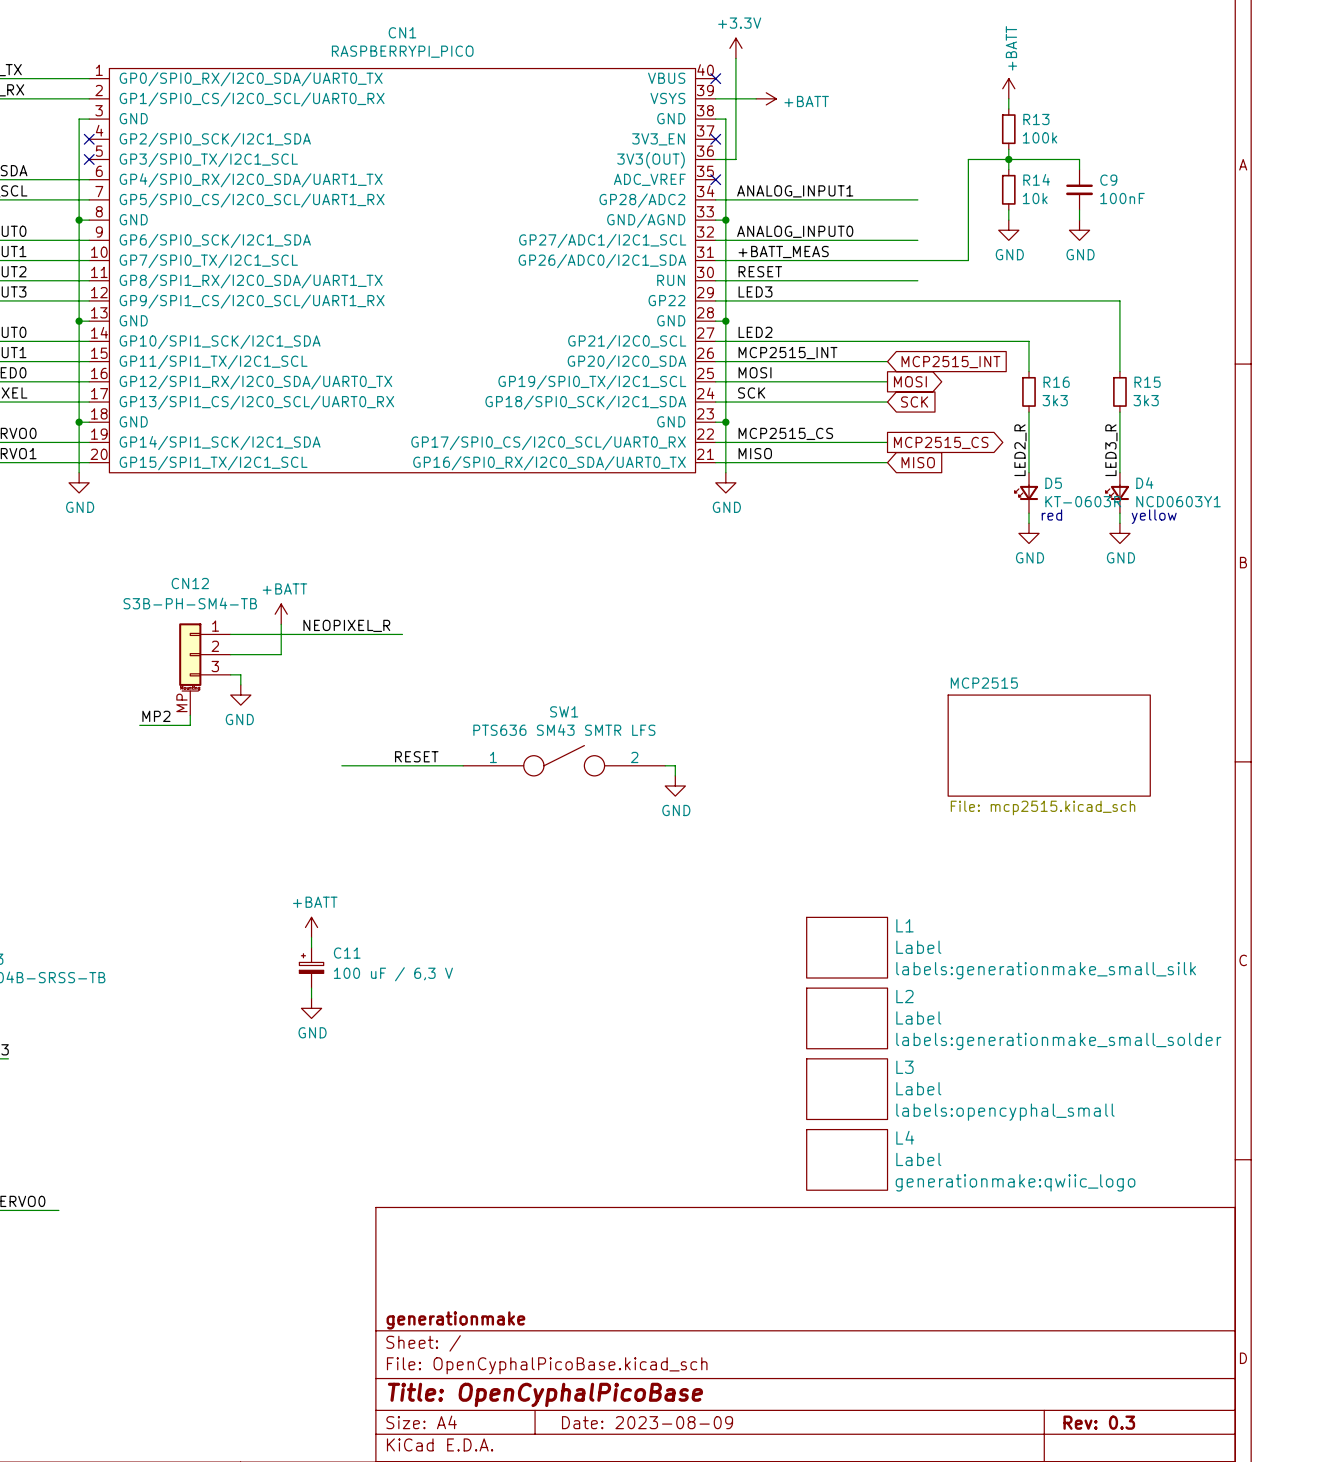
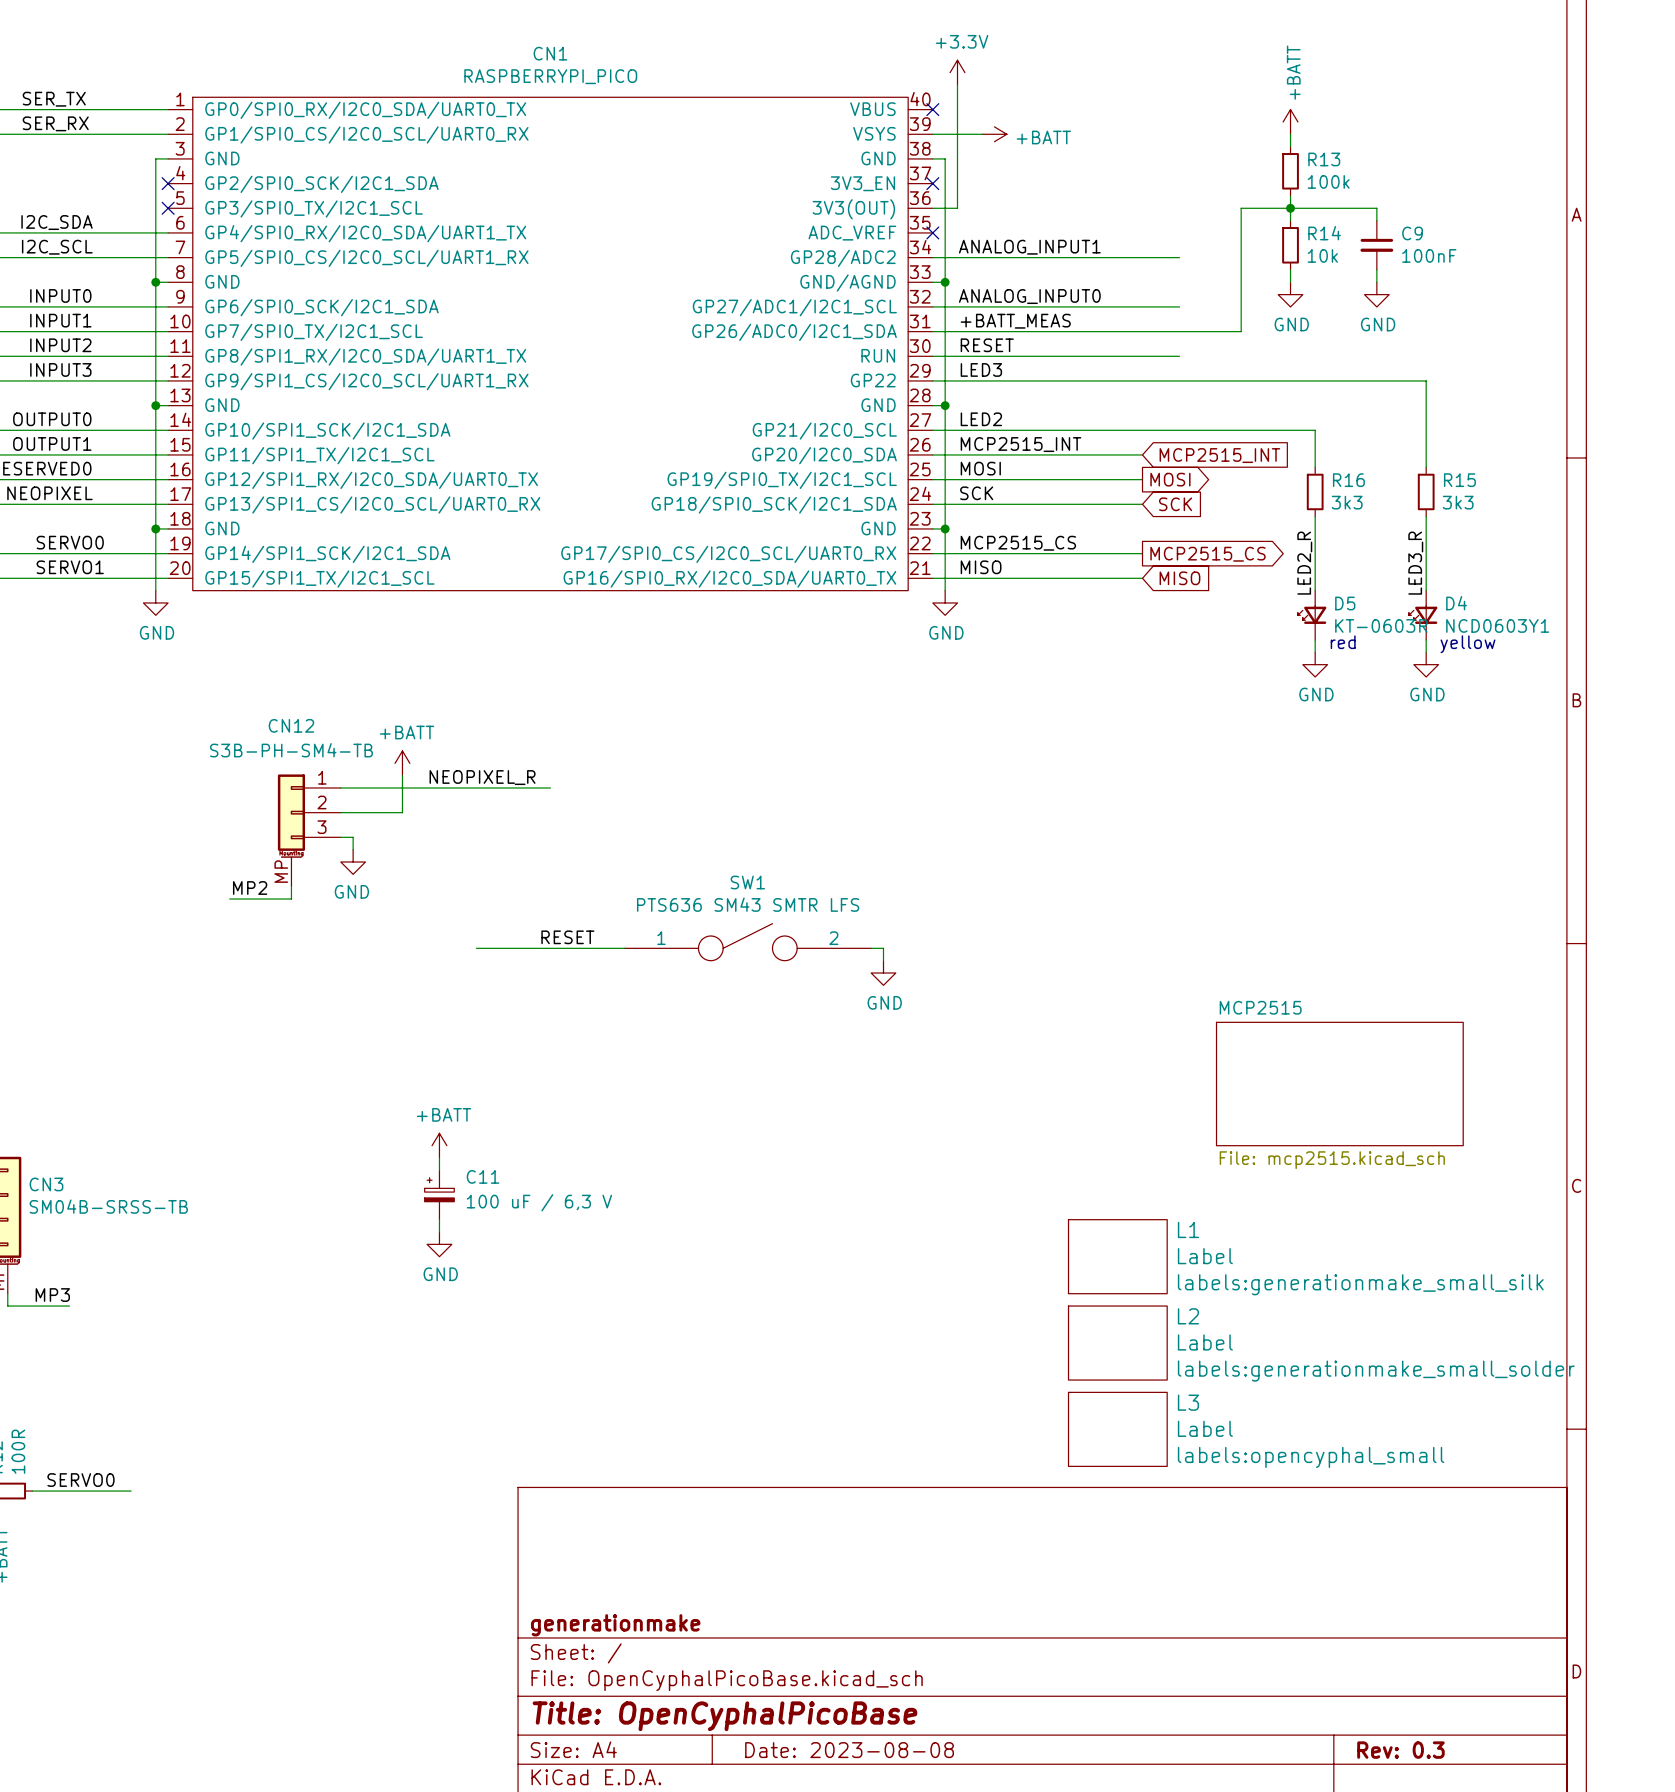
sheet MCP2515 position: (1049, 745) -> (1339, 1084)
L1 position: (847, 947) -> (1117, 1256)
L2 position: (847, 1018) -> (1117, 1343)
L3 position: (847, 1089) -> (1117, 1429)
L4: Label (847, 1159) -> none
title block: Date: 2023-08-09 (647, 1422) -> Date: 2023-08-08 (849, 1750)

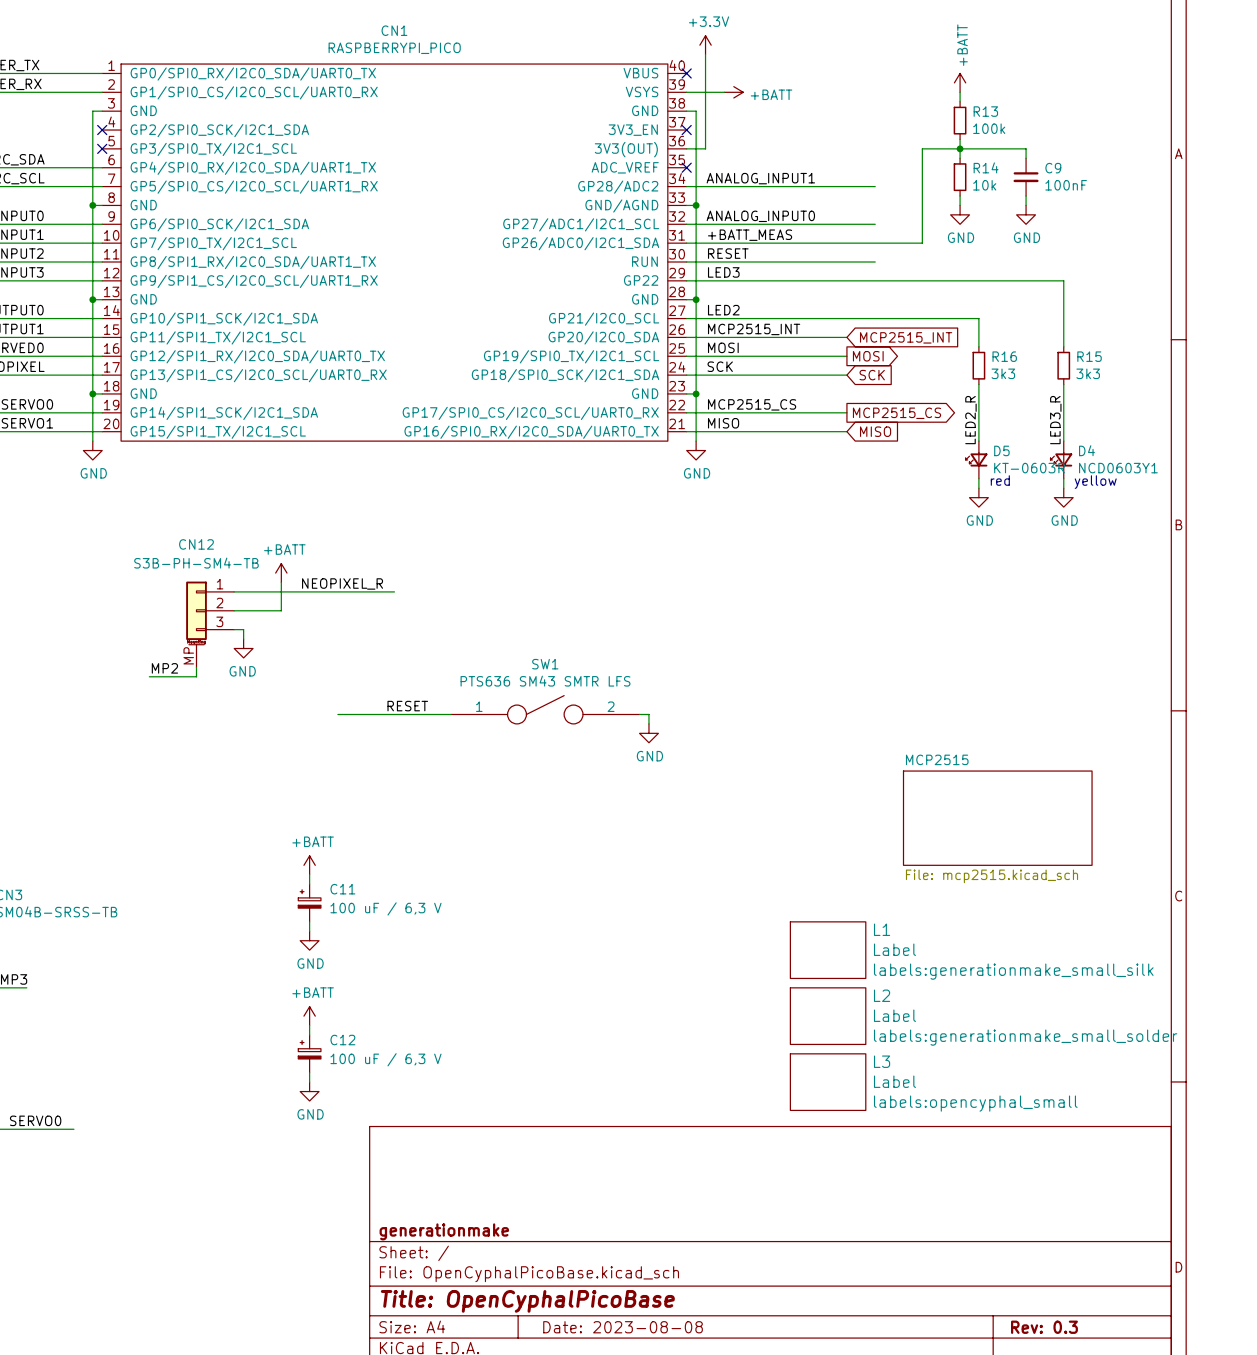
power symbol: none -> +BATT (309, 1016)
wire: none -> (309, 1025) (309, 1034)
C12: none -> 100 uF / 6,3 V (309, 1053)
wire: none -> (309, 1072) (309, 1082)
power symbol: none -> GND (309, 1091)

